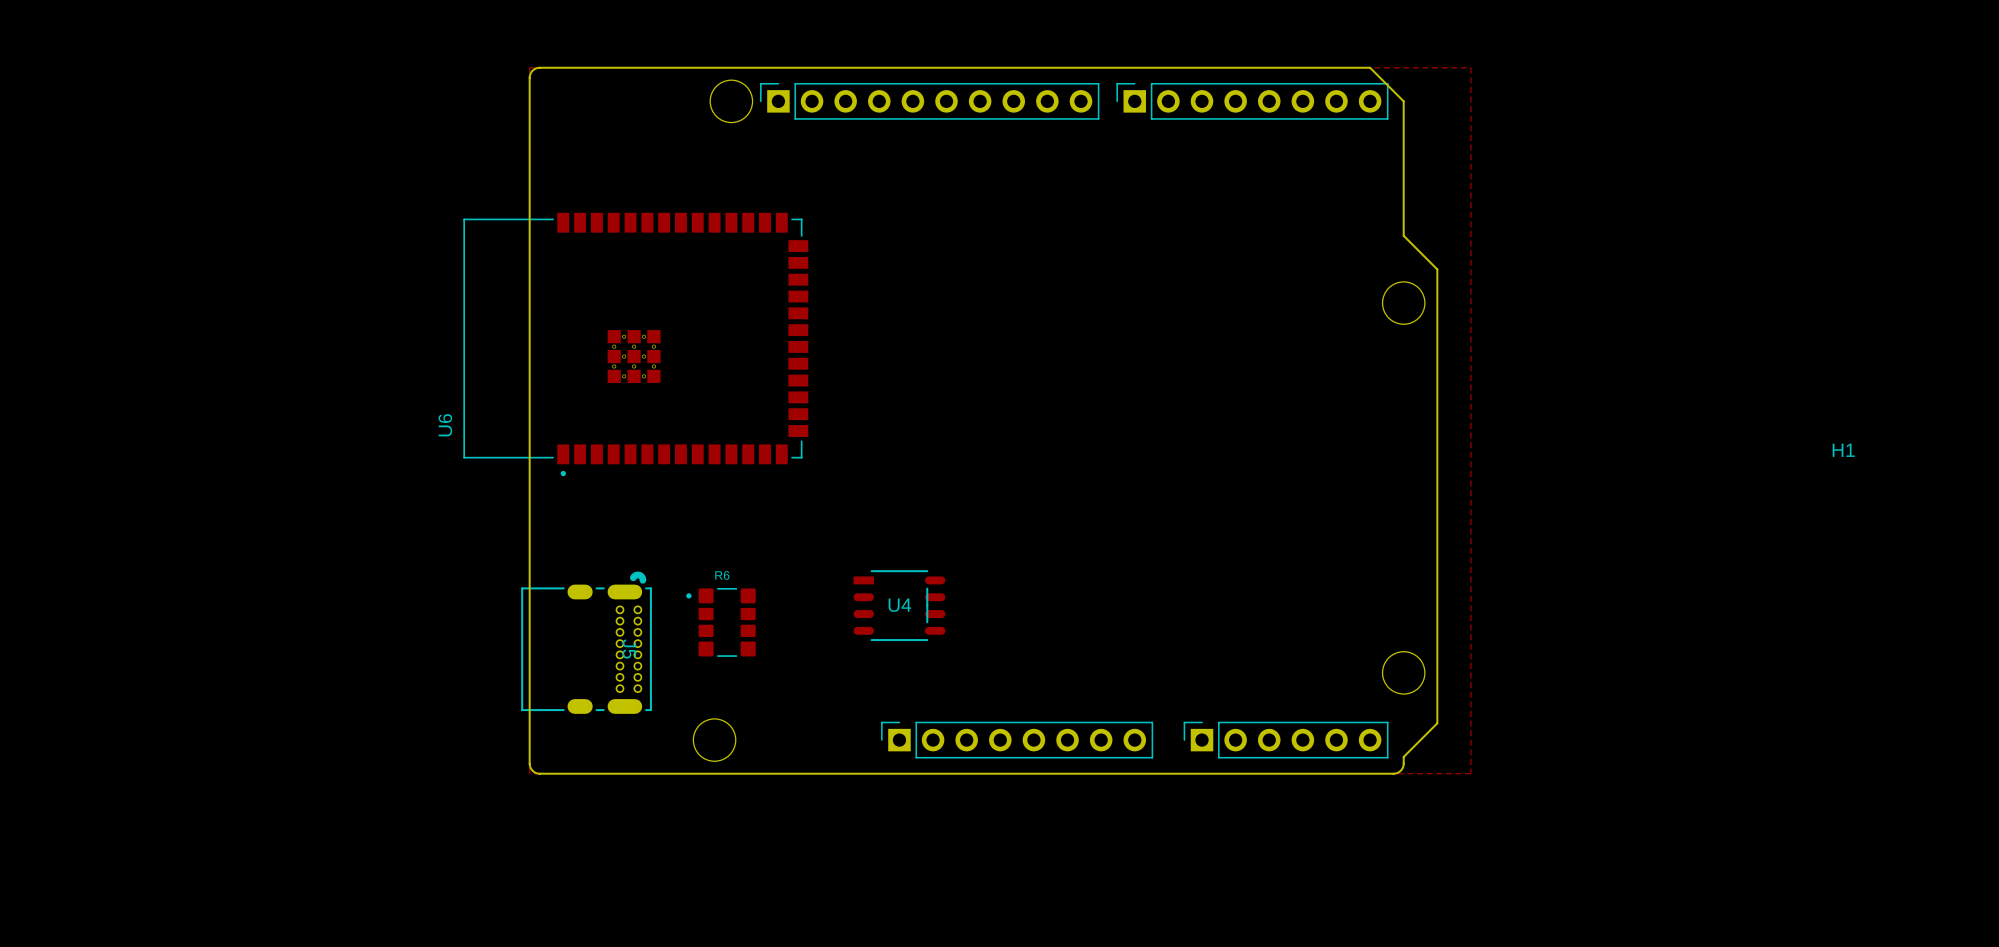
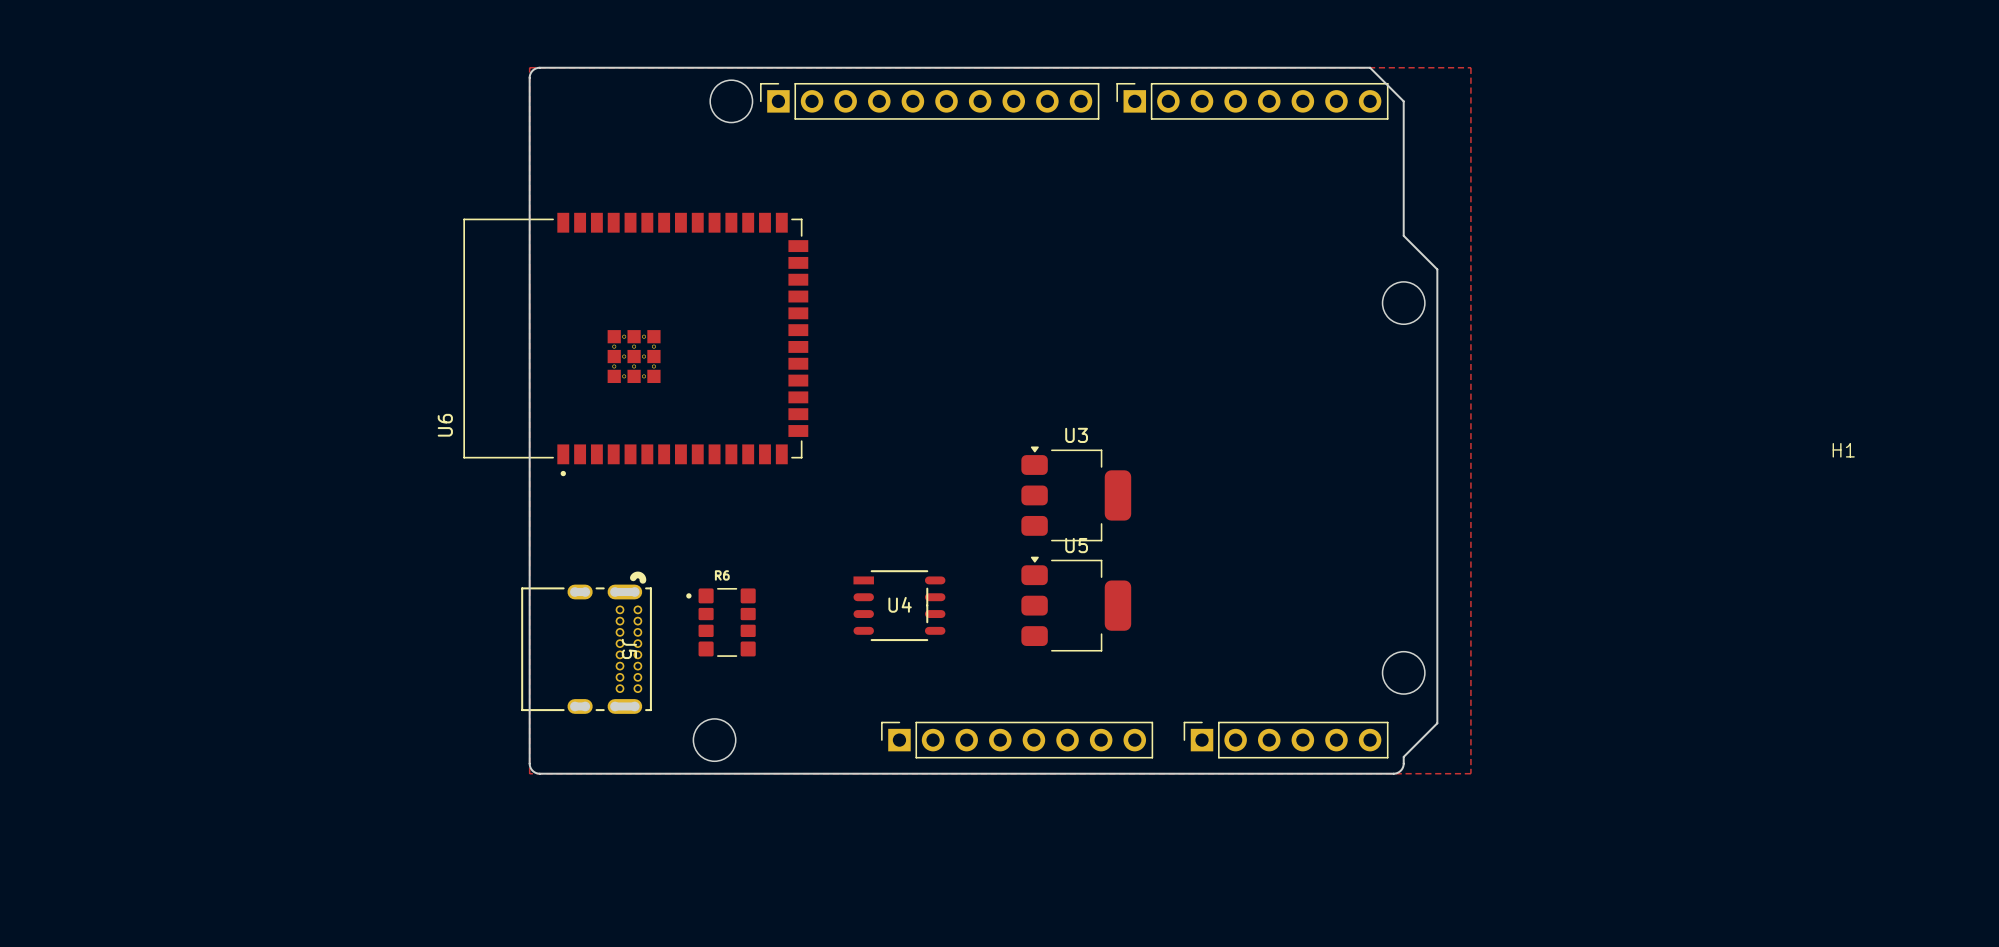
U3: none -> (1076, 493)
U5: none -> (1076, 604)

